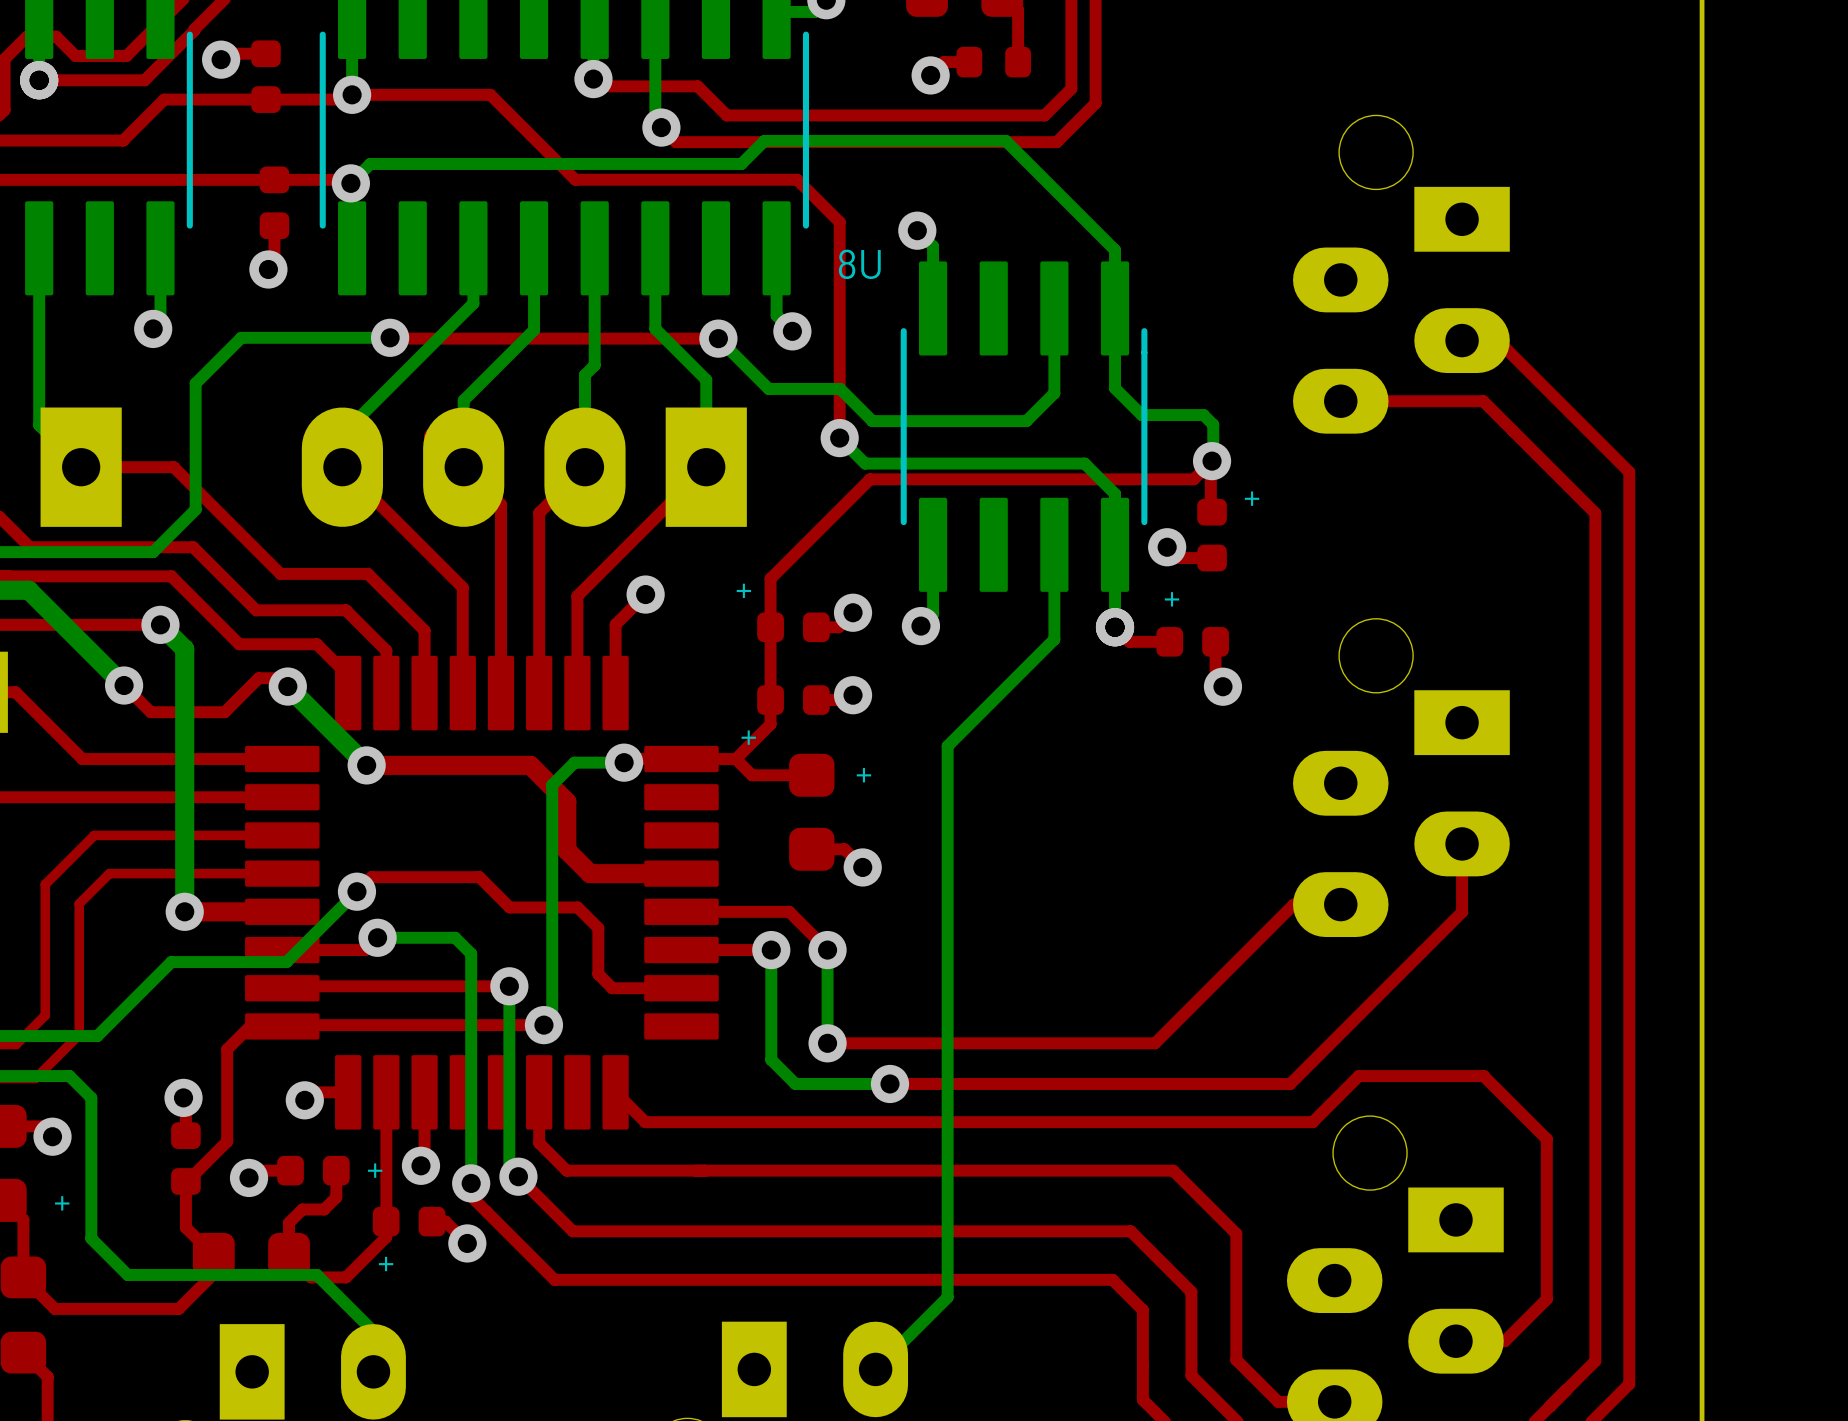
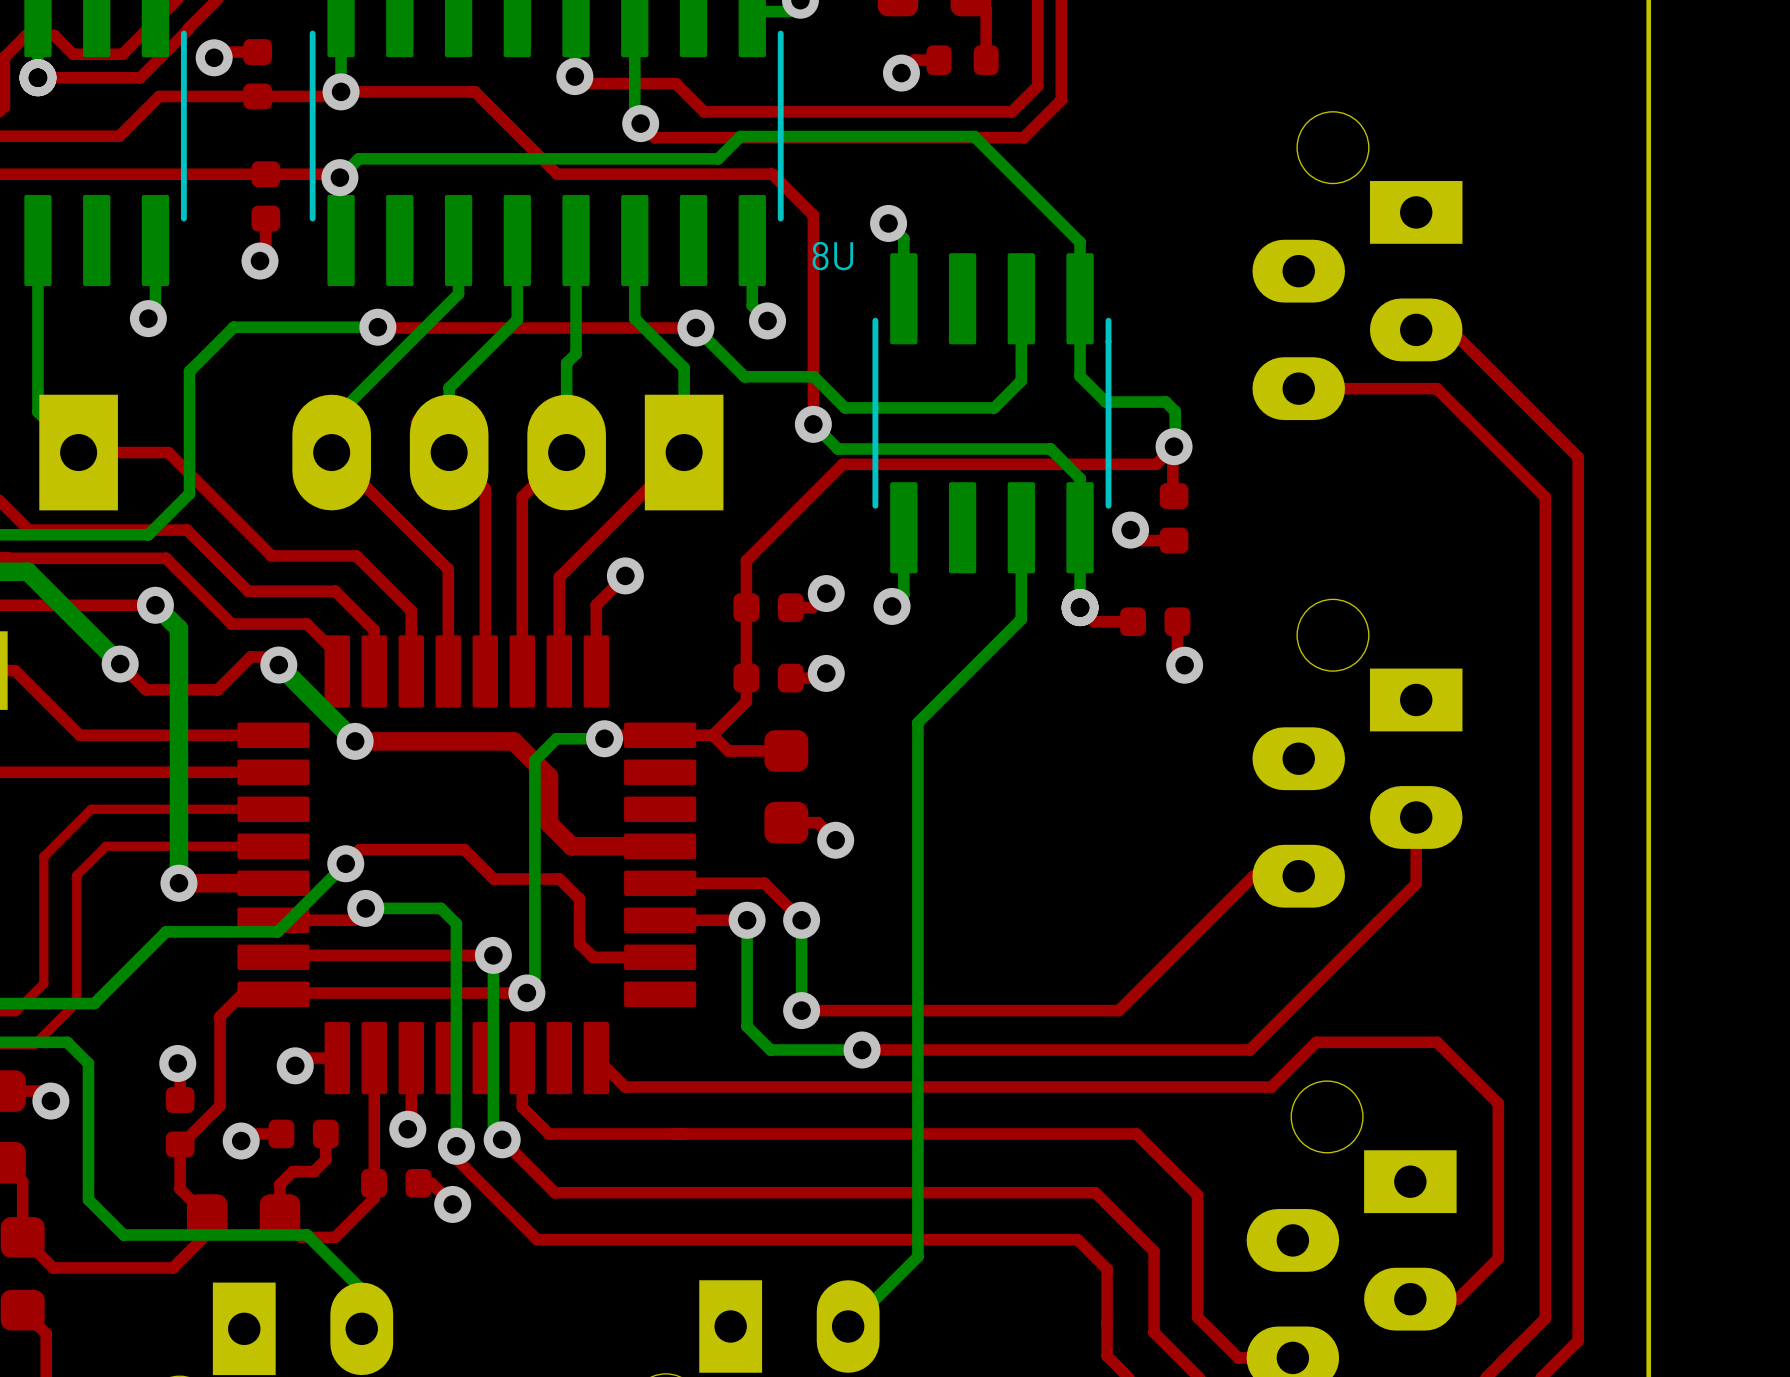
text: + (1252, 498) -> none
text: + (743, 590) -> none
text: + (1172, 599) -> none
text: + (748, 737) -> none
text: + (863, 775) -> none
text: + (375, 1170) -> none
text: + (62, 1203) -> none
text: + (386, 1264) -> none

